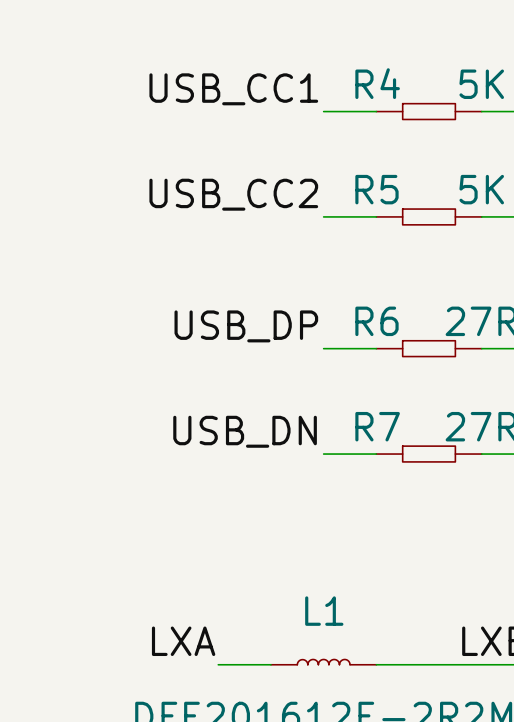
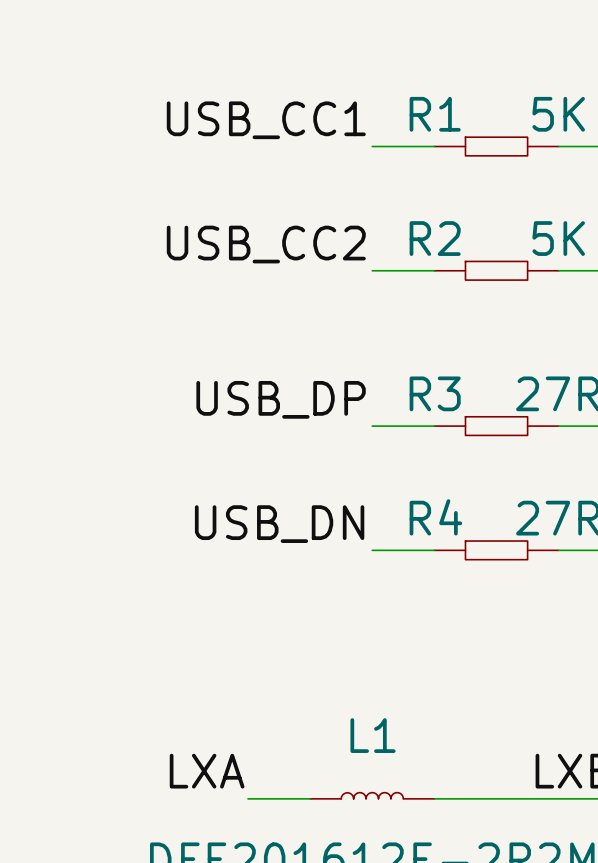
R4 name: R4 (377, 83) -> R1 (435, 114)
R5 name: R5 (376, 189) -> R2 (435, 238)
R6 name: R6 (376, 321) -> R3 (435, 393)
R7 name: R7 (377, 426) -> R4 (435, 517)

